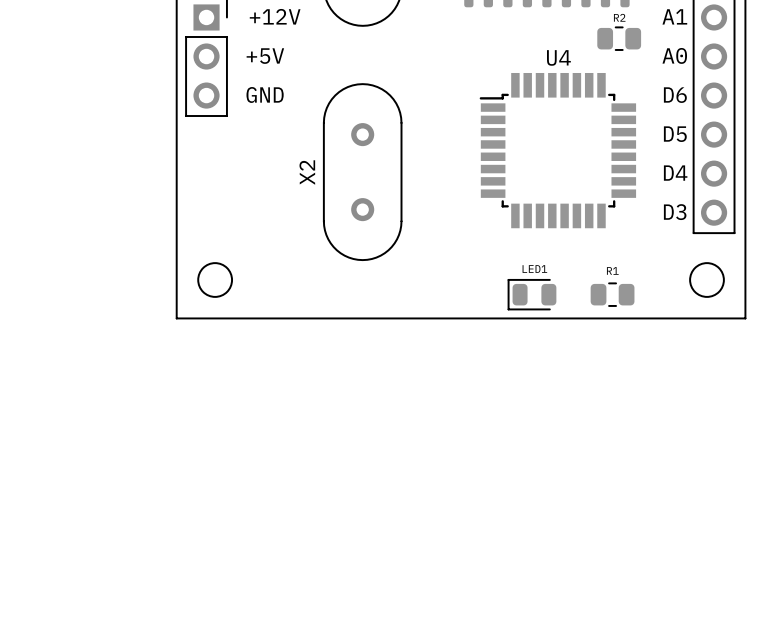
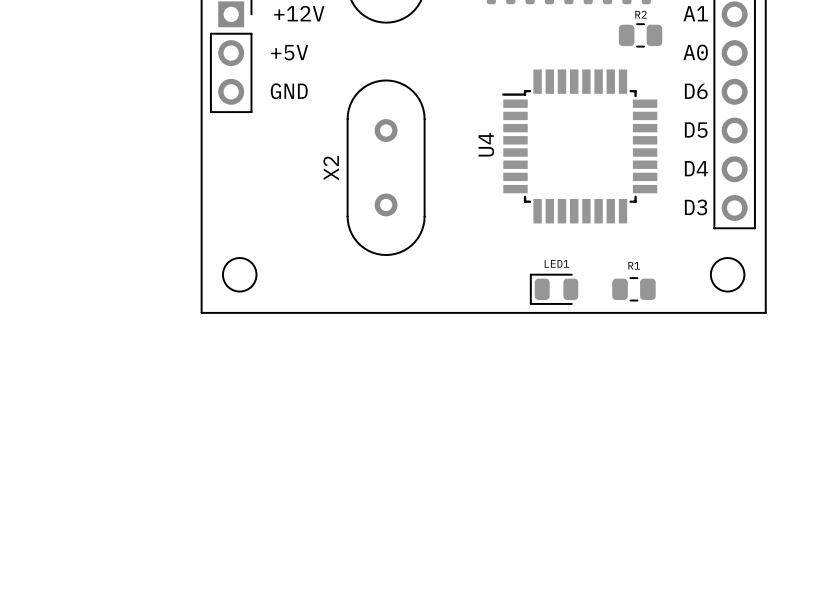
U4 name rotation: 0° (558, 57) -> 90° counterclockwise (486, 144)
U4 name position: U4 (558, 57) -> U4 (486, 144)

